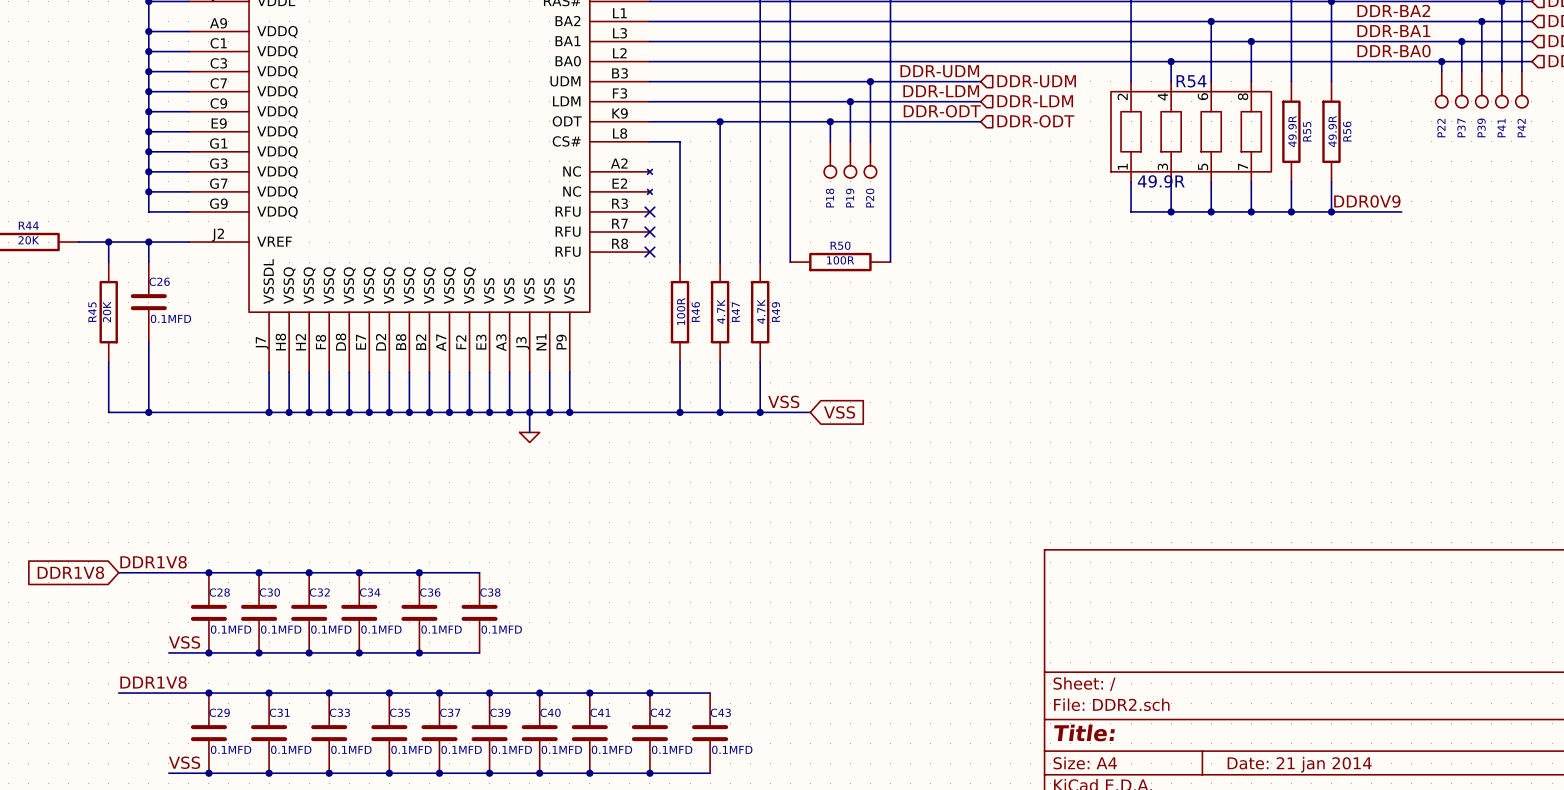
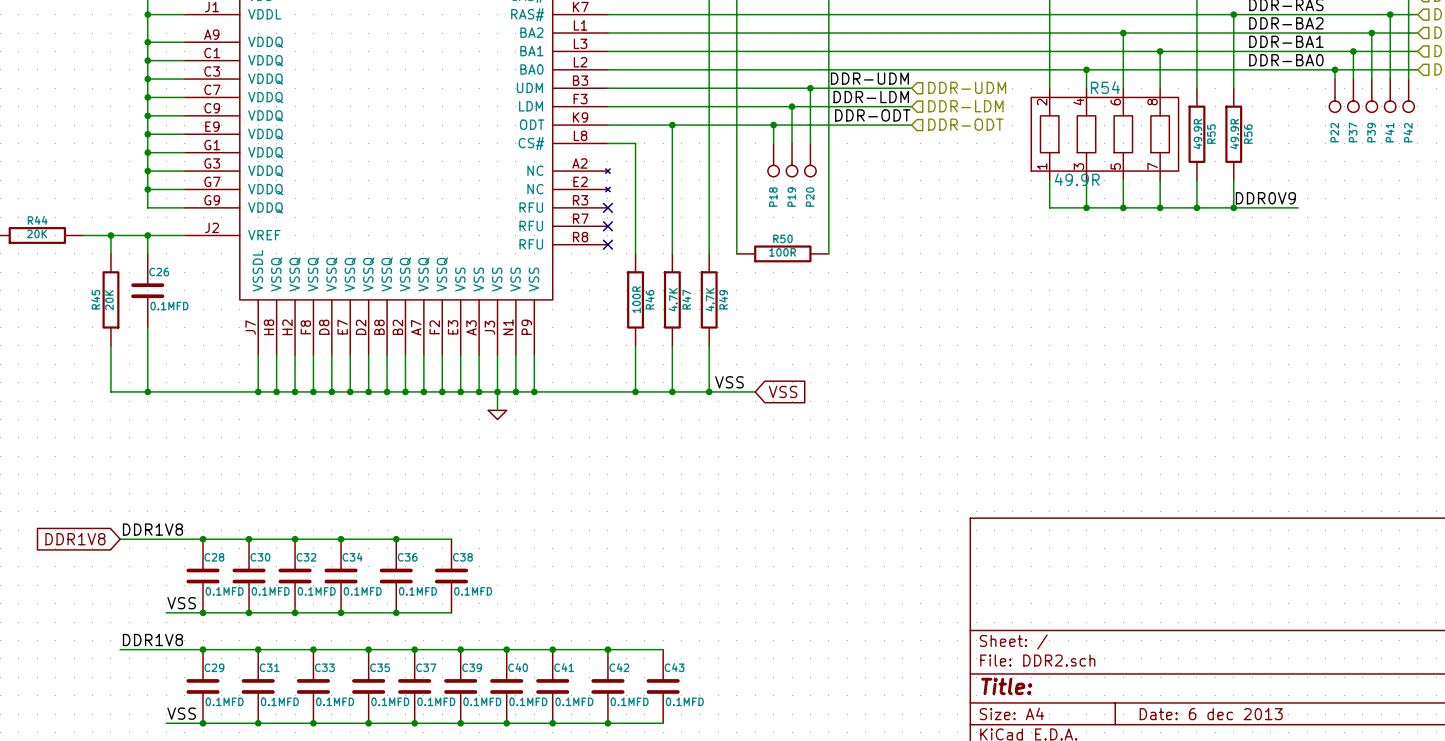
title block: Date: 21 jan 2014 (1299, 764) -> Date: 6 dec 2013 (1211, 714)

